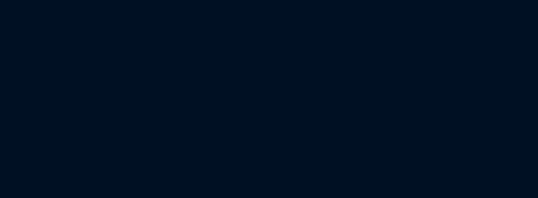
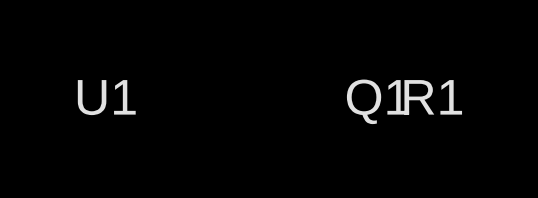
U1: none -> (106, 97)
R1: none -> (433, 97)
Q1: none -> (377, 101)

